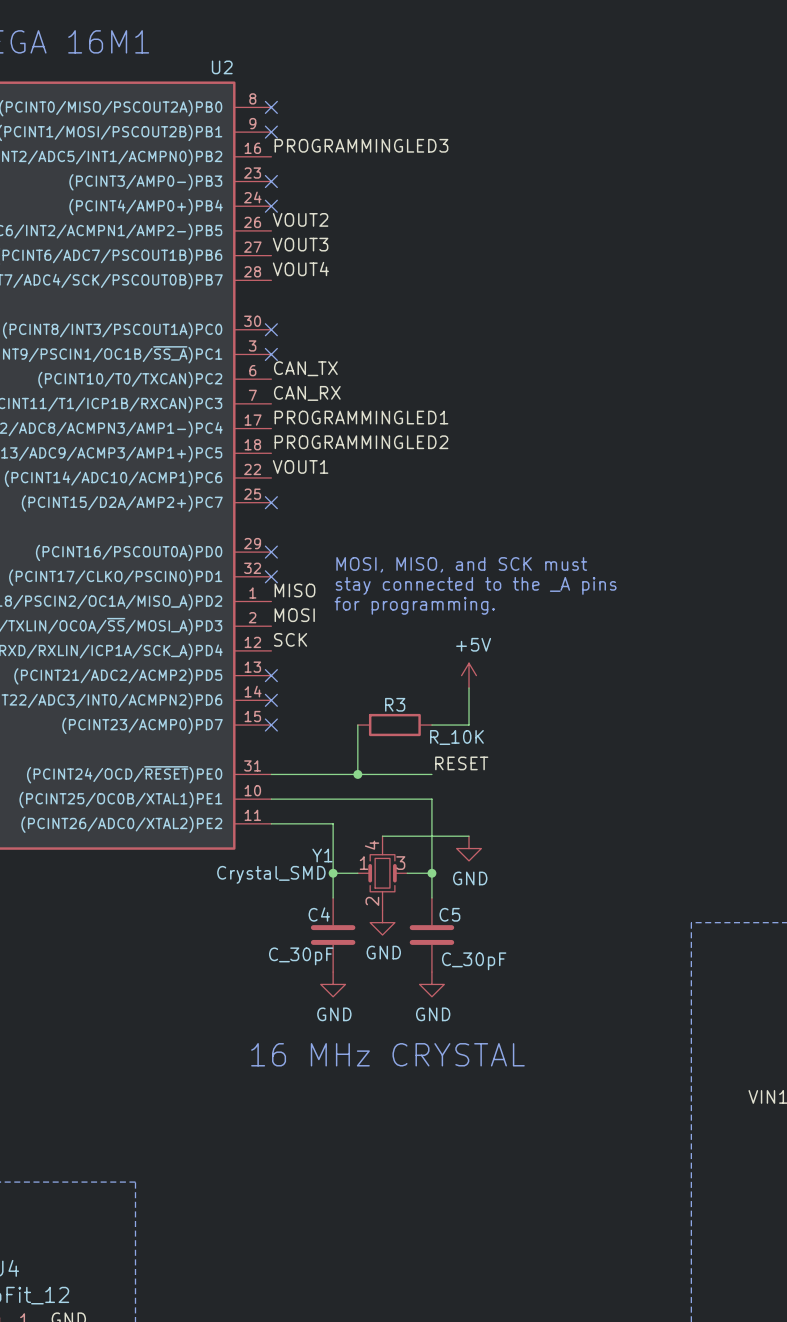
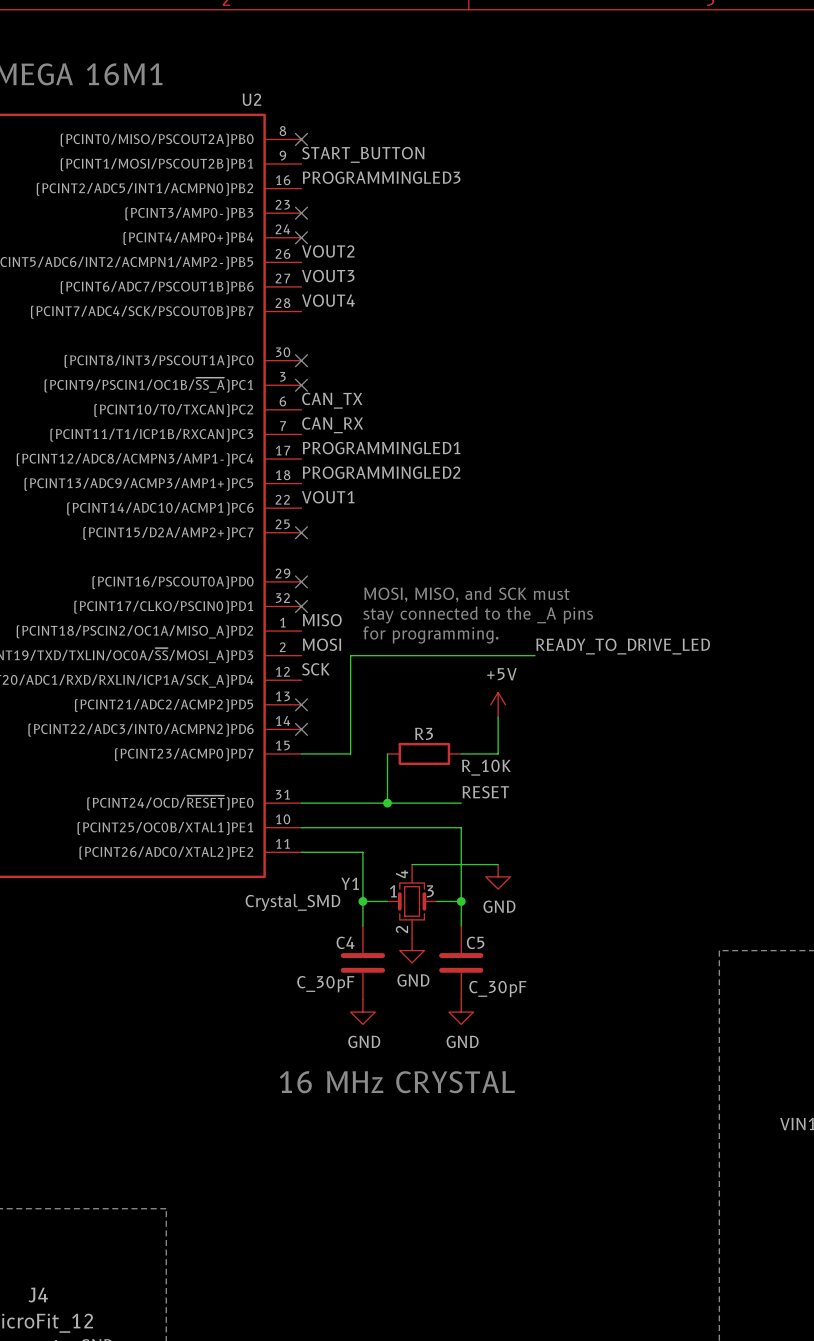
label: none -> START_BUTTON (363, 154)
no-connect mark: (271, 132) -> none
label: none -> READY_TO_DRIVE_LED (623, 646)
wire: none -> (535, 655) (350, 655) (350, 753) (301, 753)
no-connect mark: (271, 725) -> none

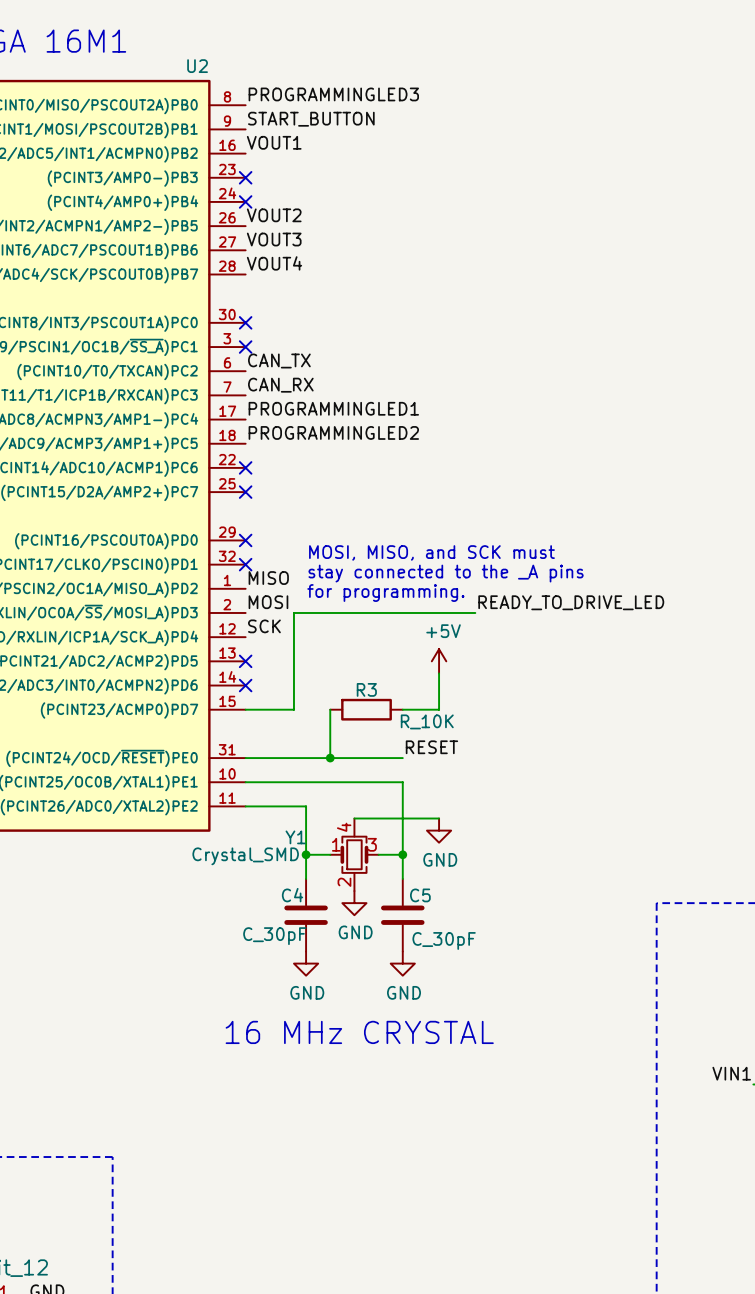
label: none -> PROGRAMMINGLED3 (333, 94)
no-connect mark: (301, 139) -> none
label: PROGRAMMINGLED3 (381, 177) -> VOUT1 (274, 142)
label: VOUT1 (328, 497) -> none
no-connect mark: none -> (245, 467)

